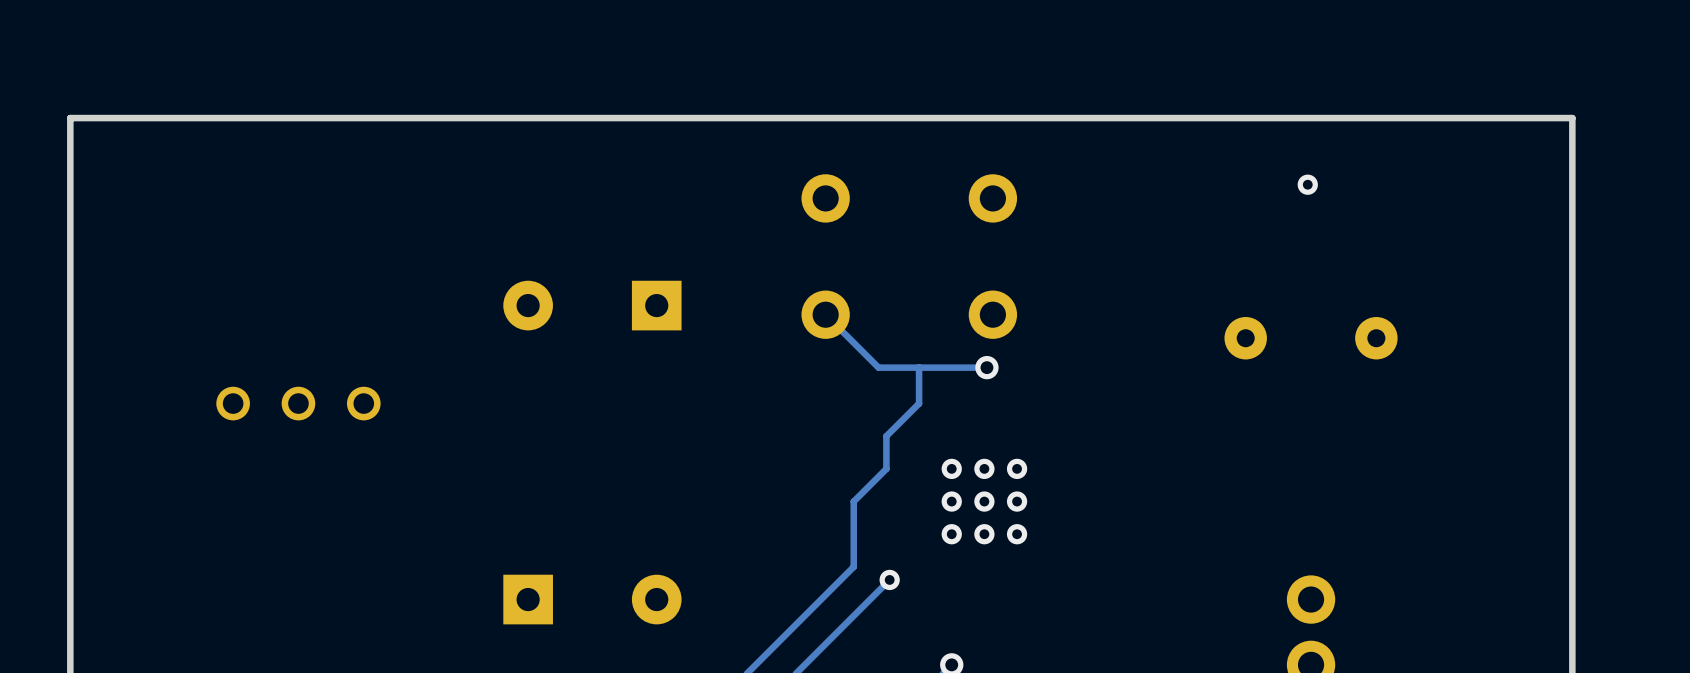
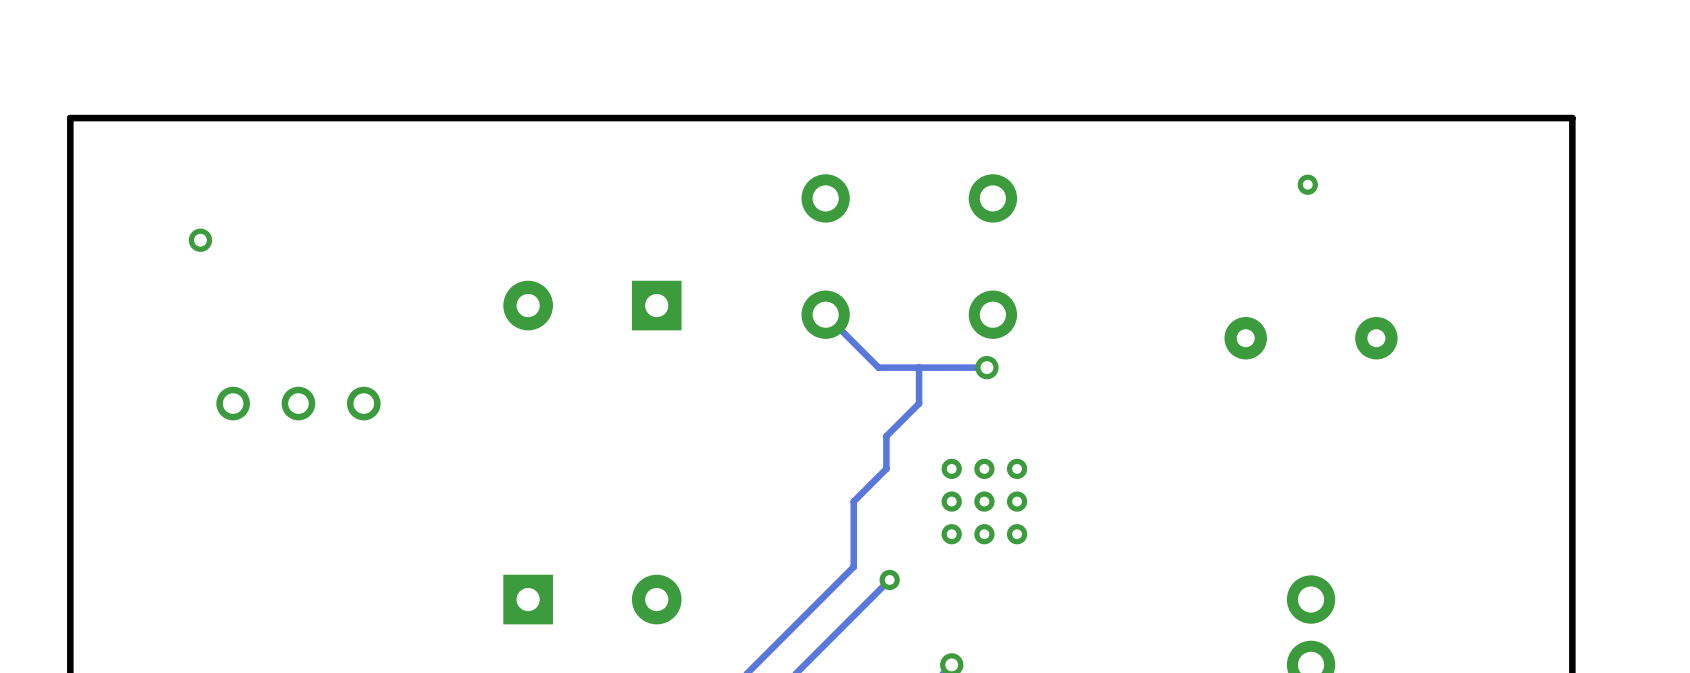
via: none -> (200, 240)

